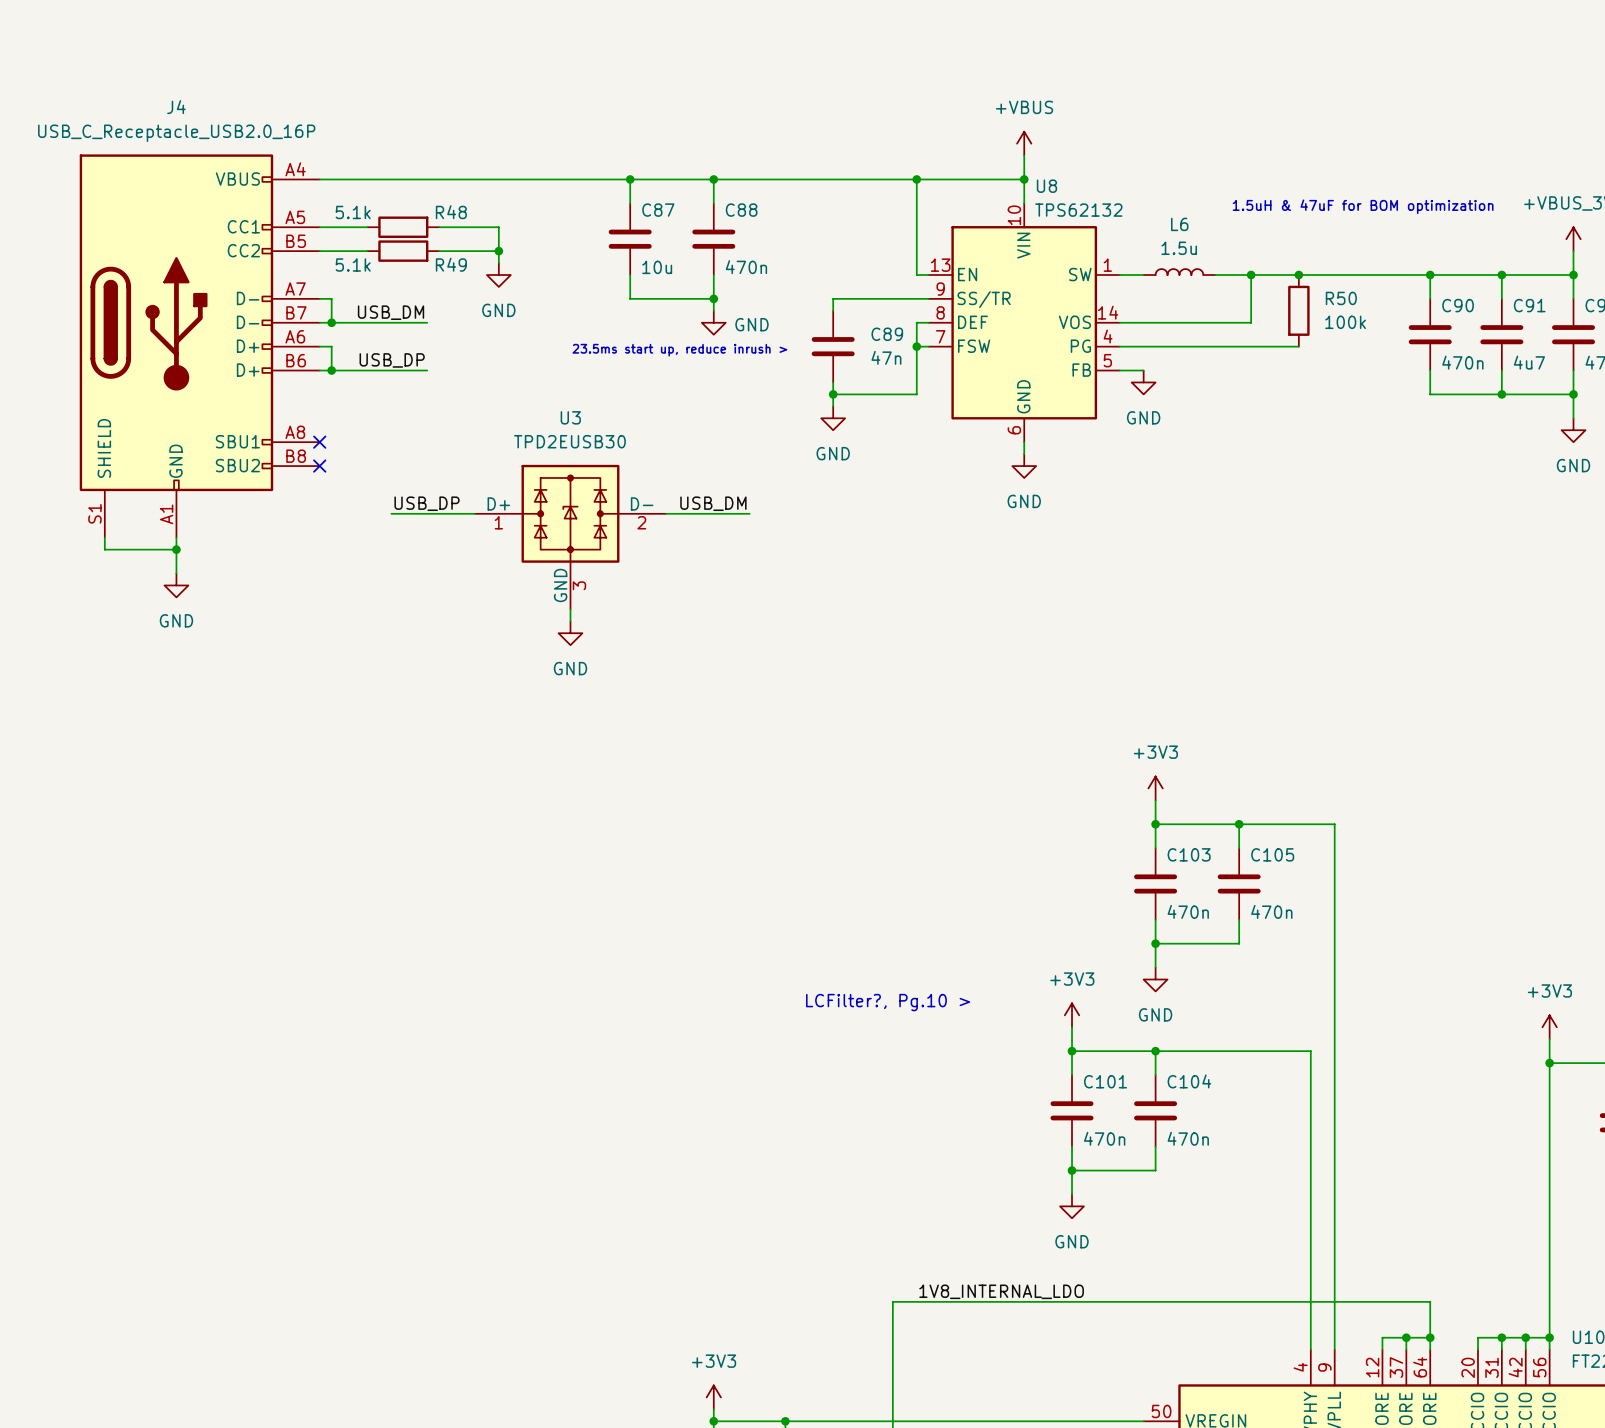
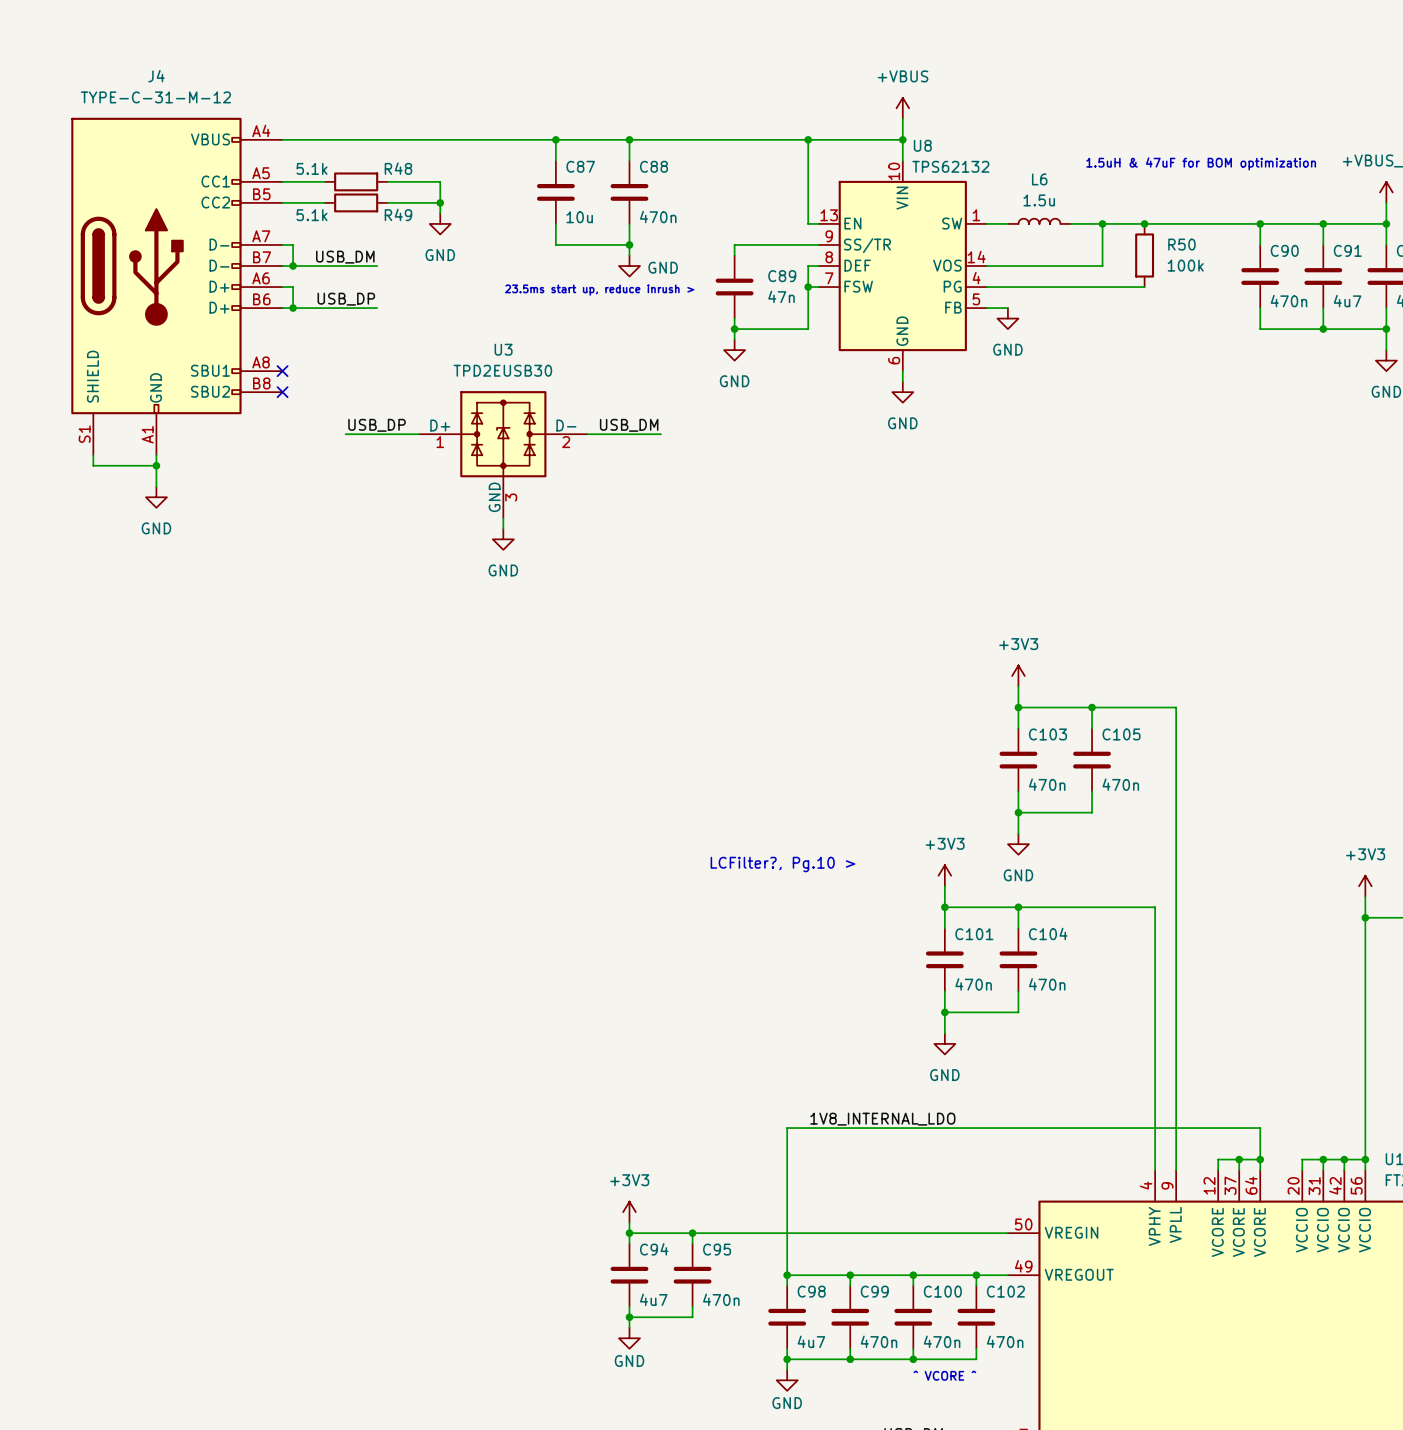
J4 value: USB_C_Receptacle_USB2.0_16P (176, 133) -> TYPE-C-31-M-12 (155, 97)

